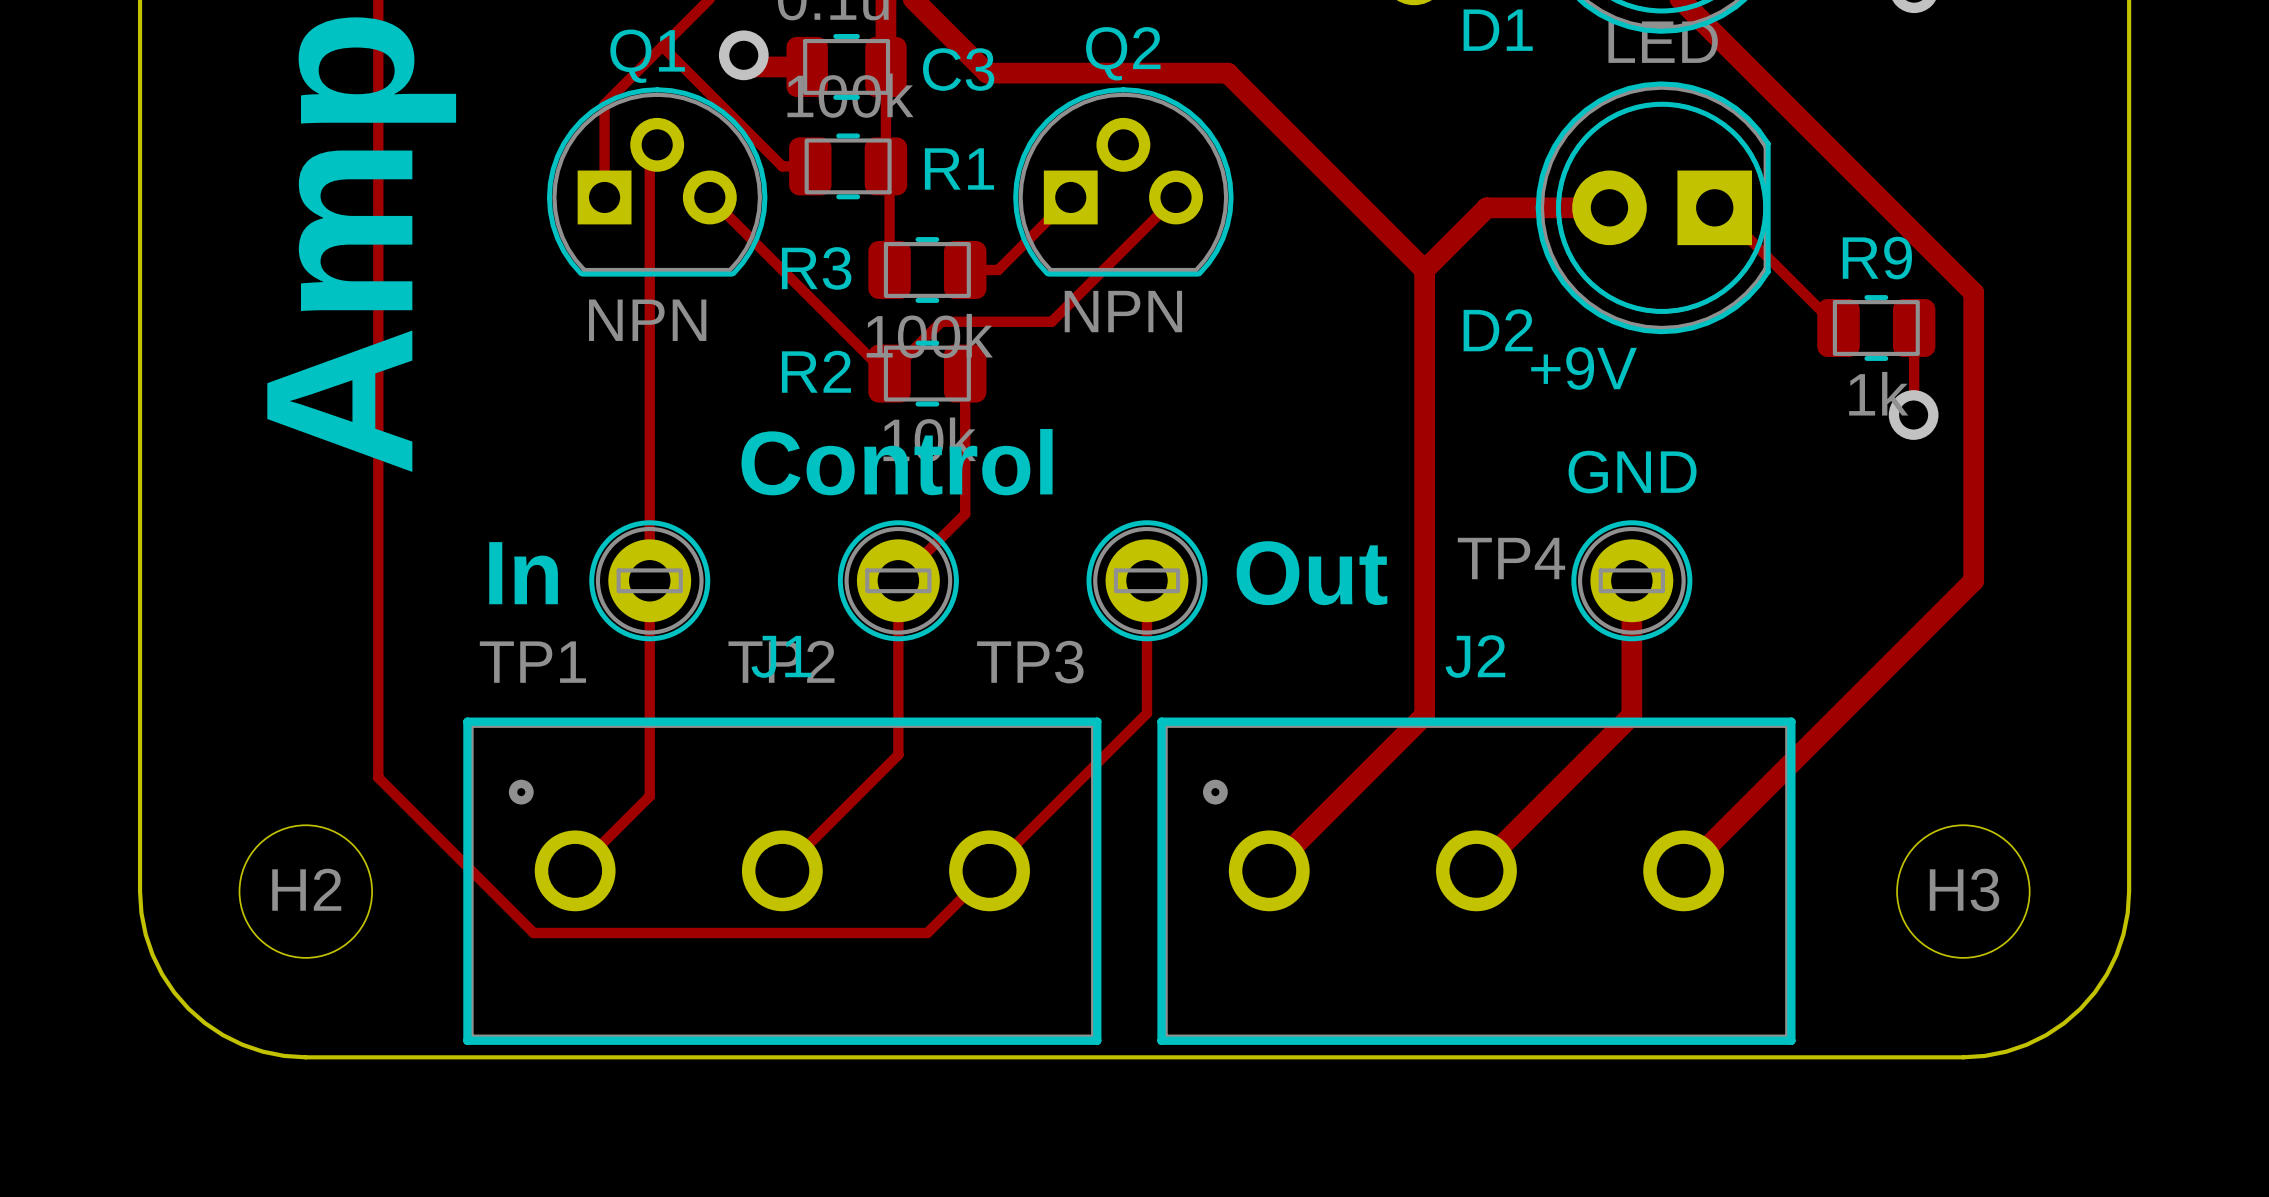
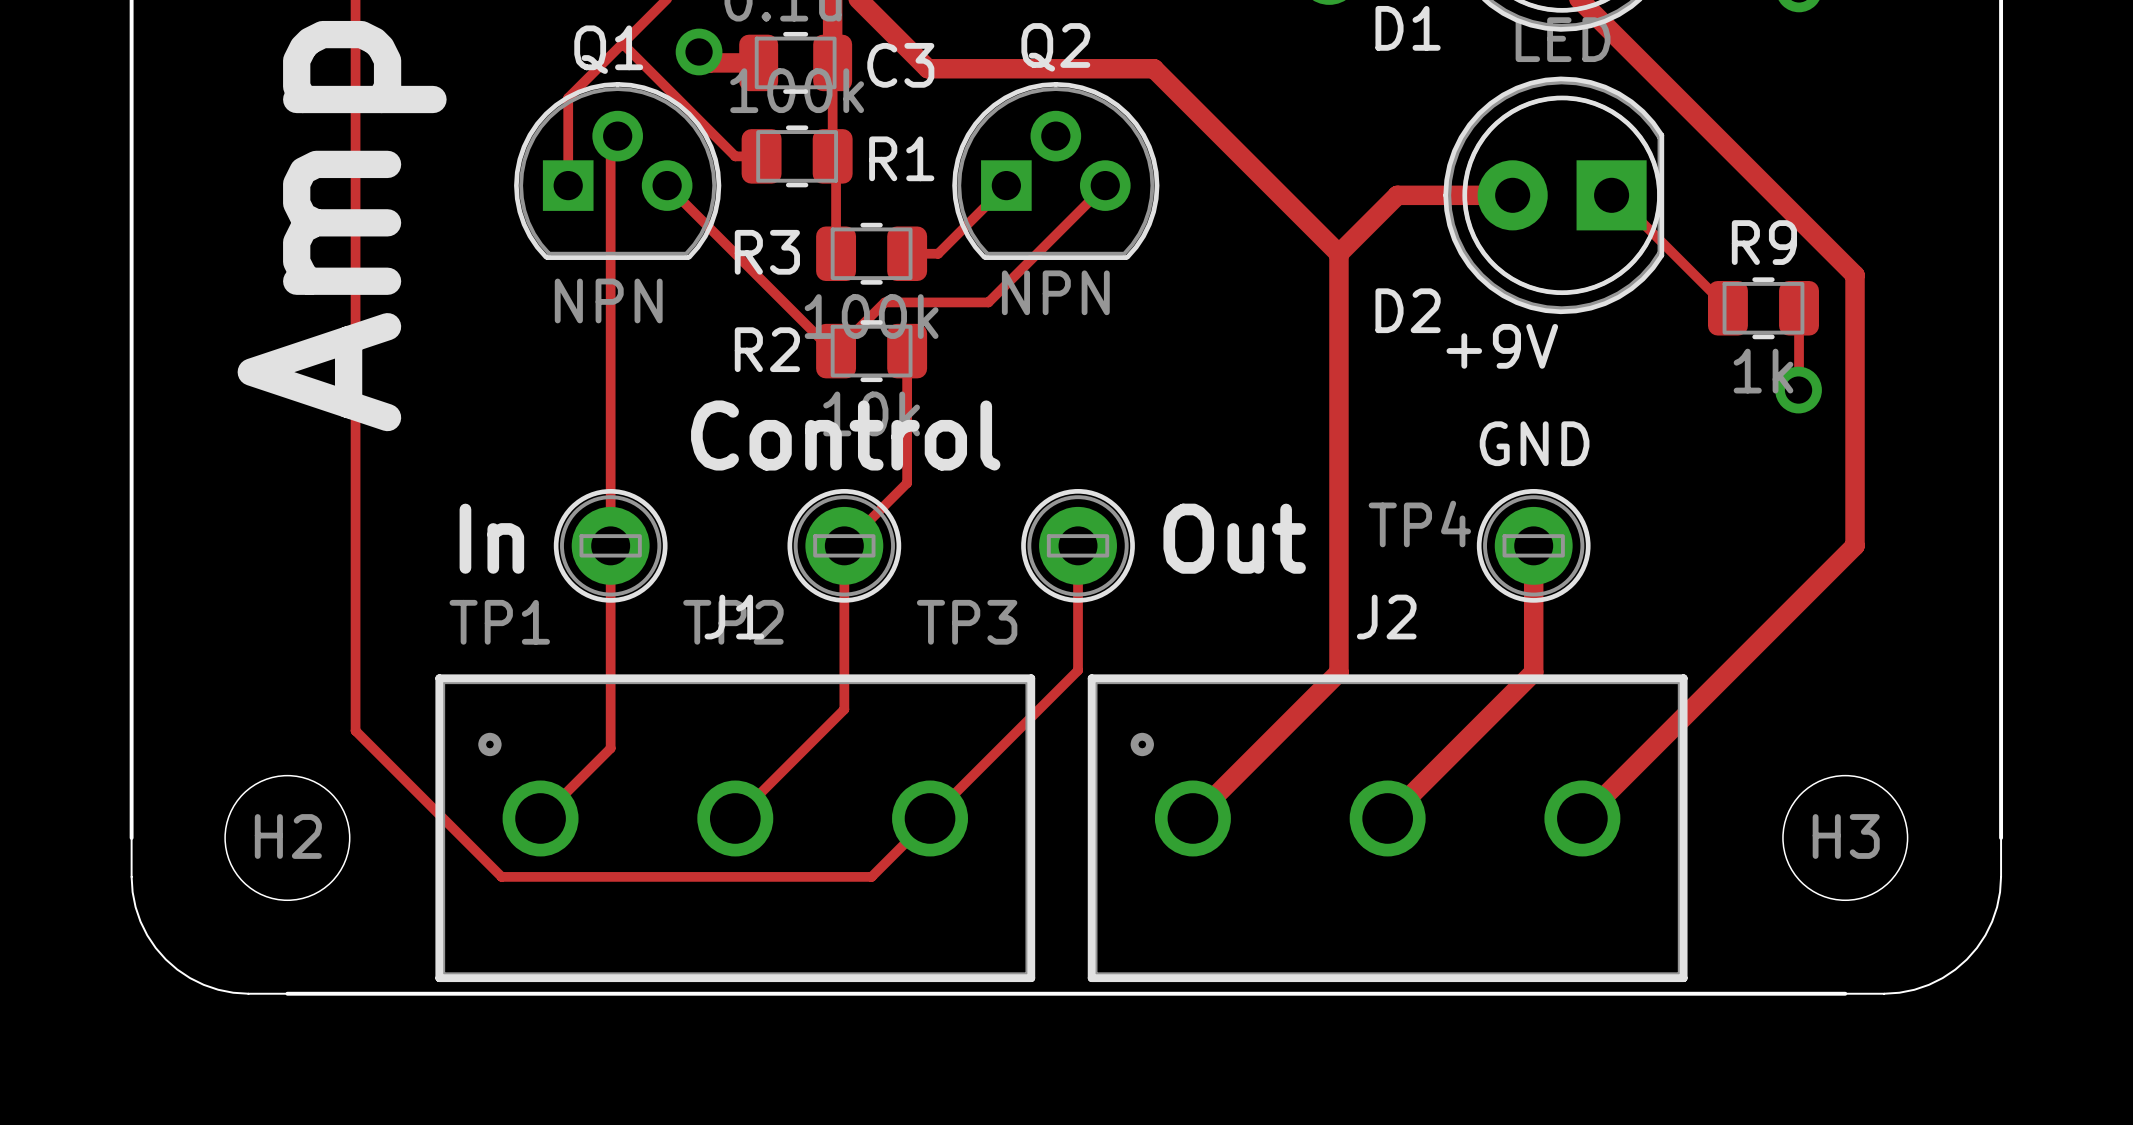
board edge: (140, 891) (145, 934) (152, 955) (162, 974) (188, 1008) (222, 1035) (242, 1044) (262, 1051) (305, 1057) -> (131, 837) (131, 876) (135, 907) (147, 935) (165, 959) (190, 978) (218, 989) (248, 993) (287, 993)
board edge: (2129, 891) (2127, 913) (2116, 955) (2094, 992) (2080, 1008) (2064, 1023) (2026, 1044) (1984, 1055) (1963, 1057) -> (2001, 837) (2001, 876) (1997, 907) (1985, 935) (1966, 959) (1942, 978) (1914, 989) (1884, 993) (1845, 993)

